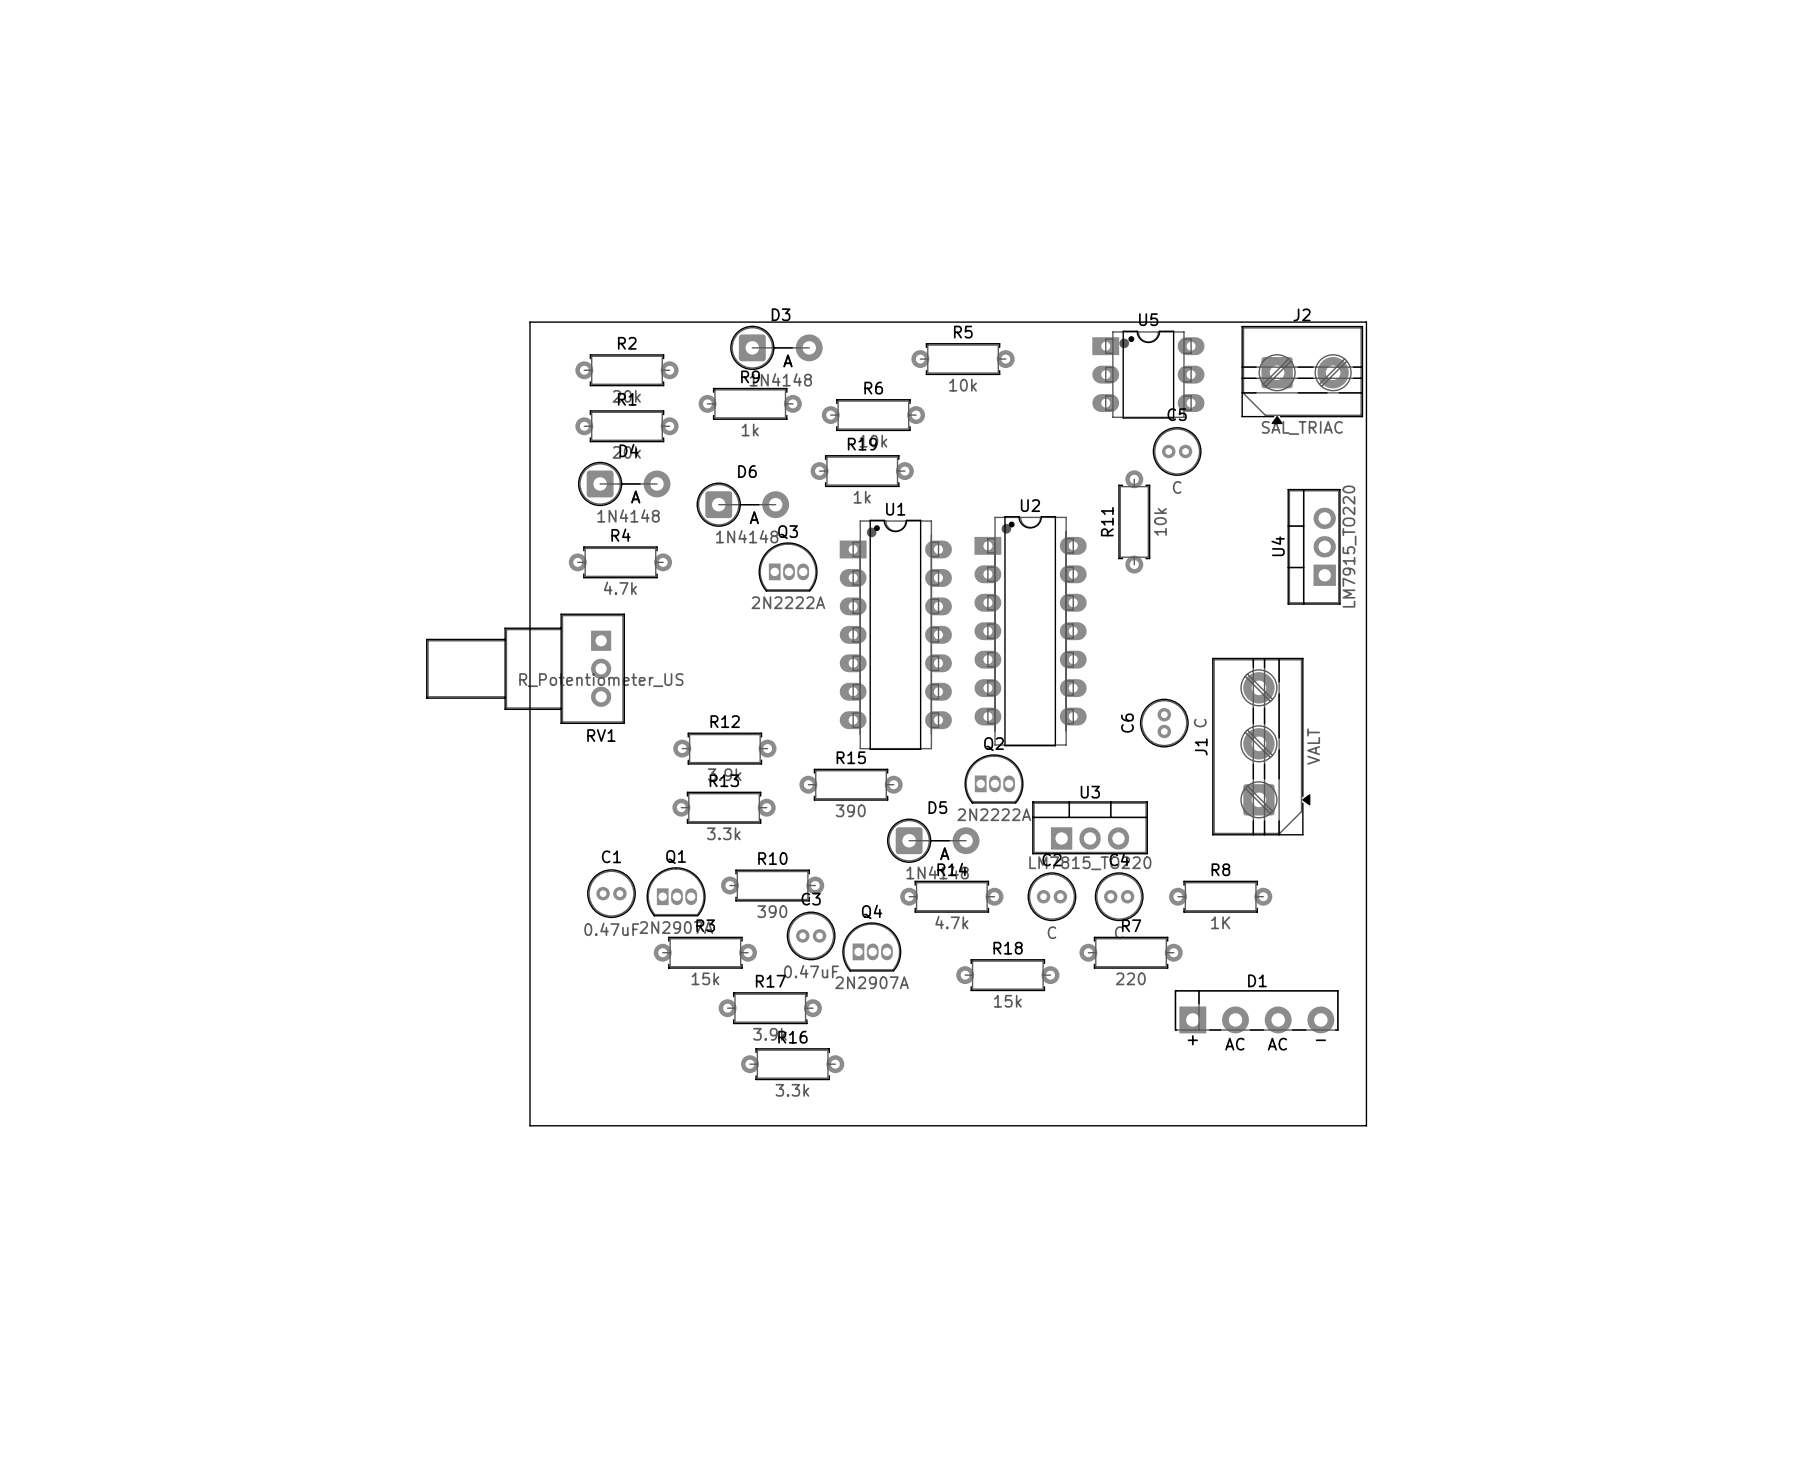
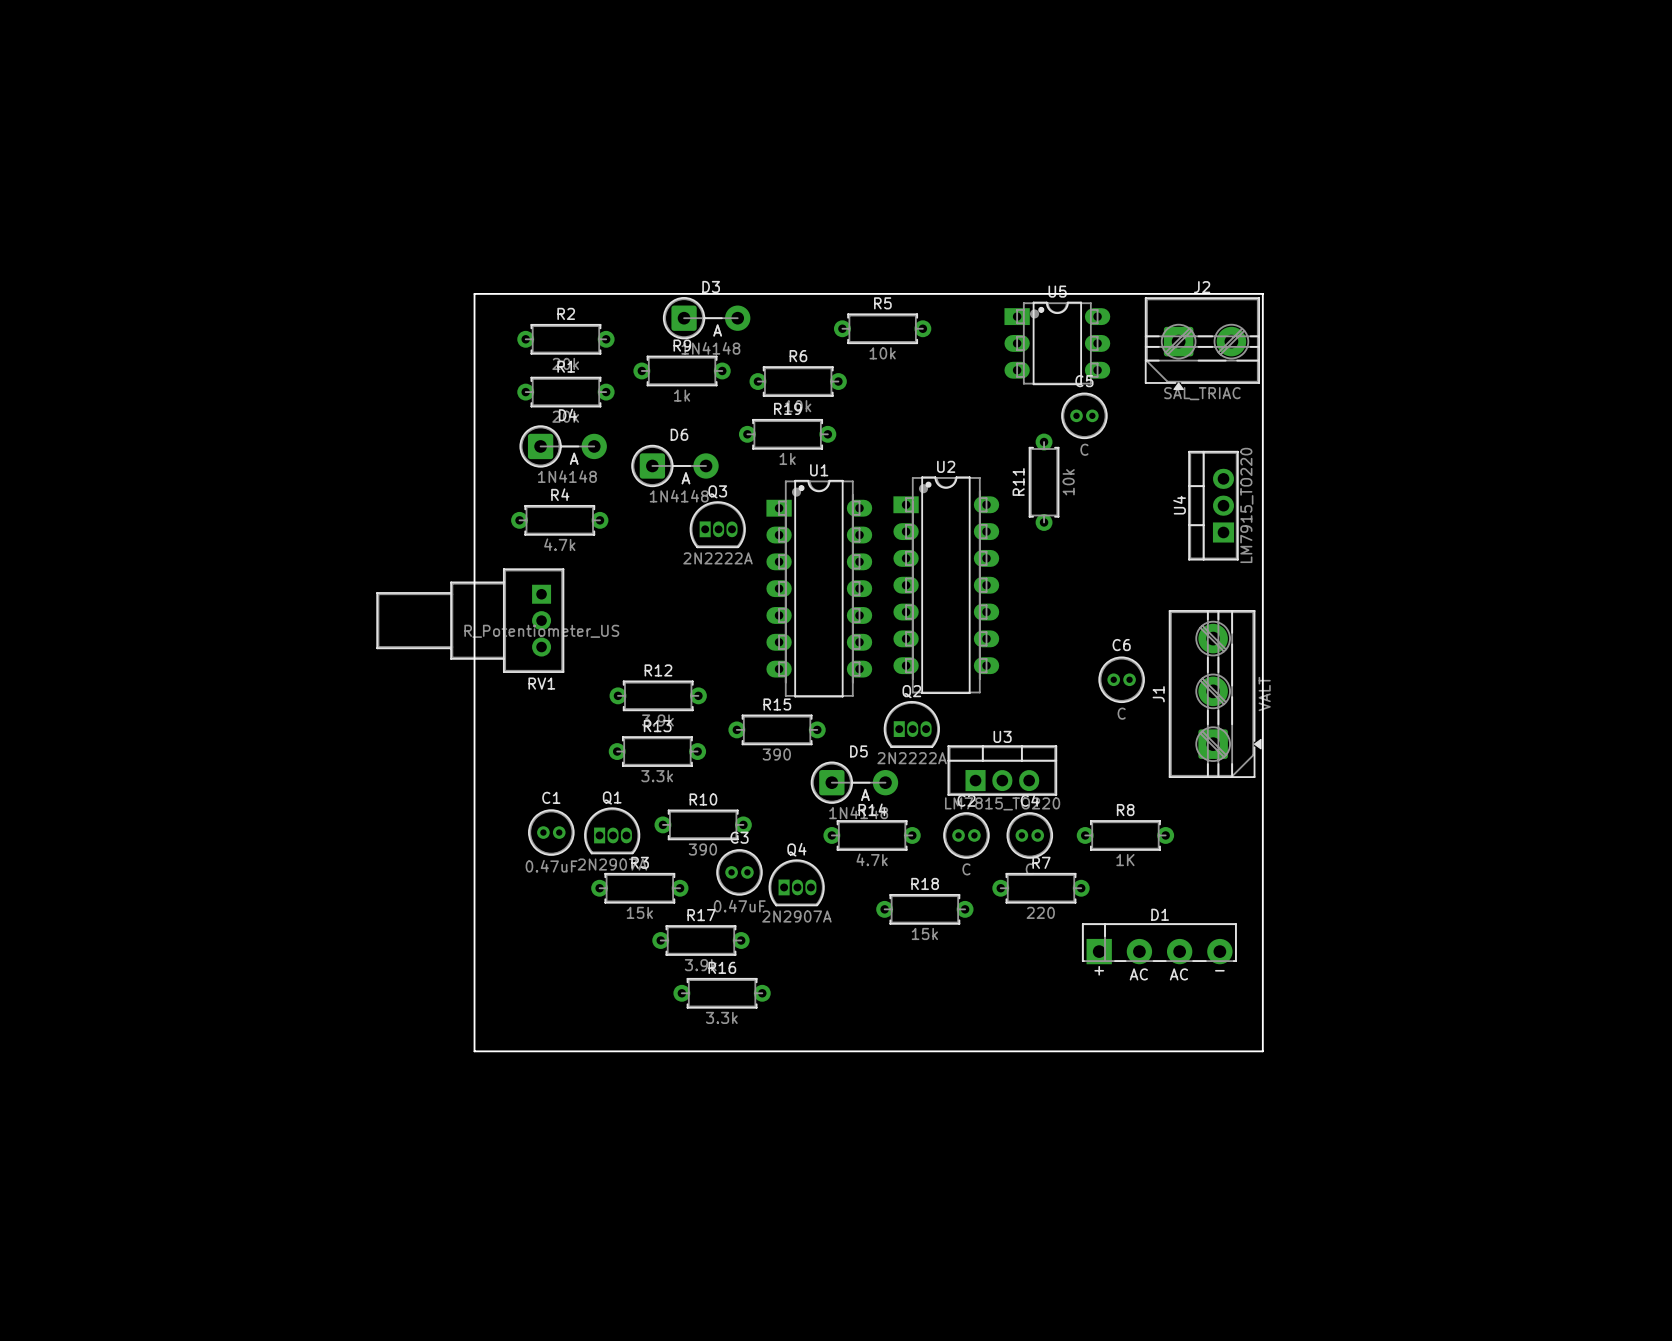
C6 rotation: 0° (1164, 723) -> 90° clockwise (1121, 679)
C6 position: (1164, 723) -> (1121, 679)
J1 position: (1261, 746) -> (1215, 694)

